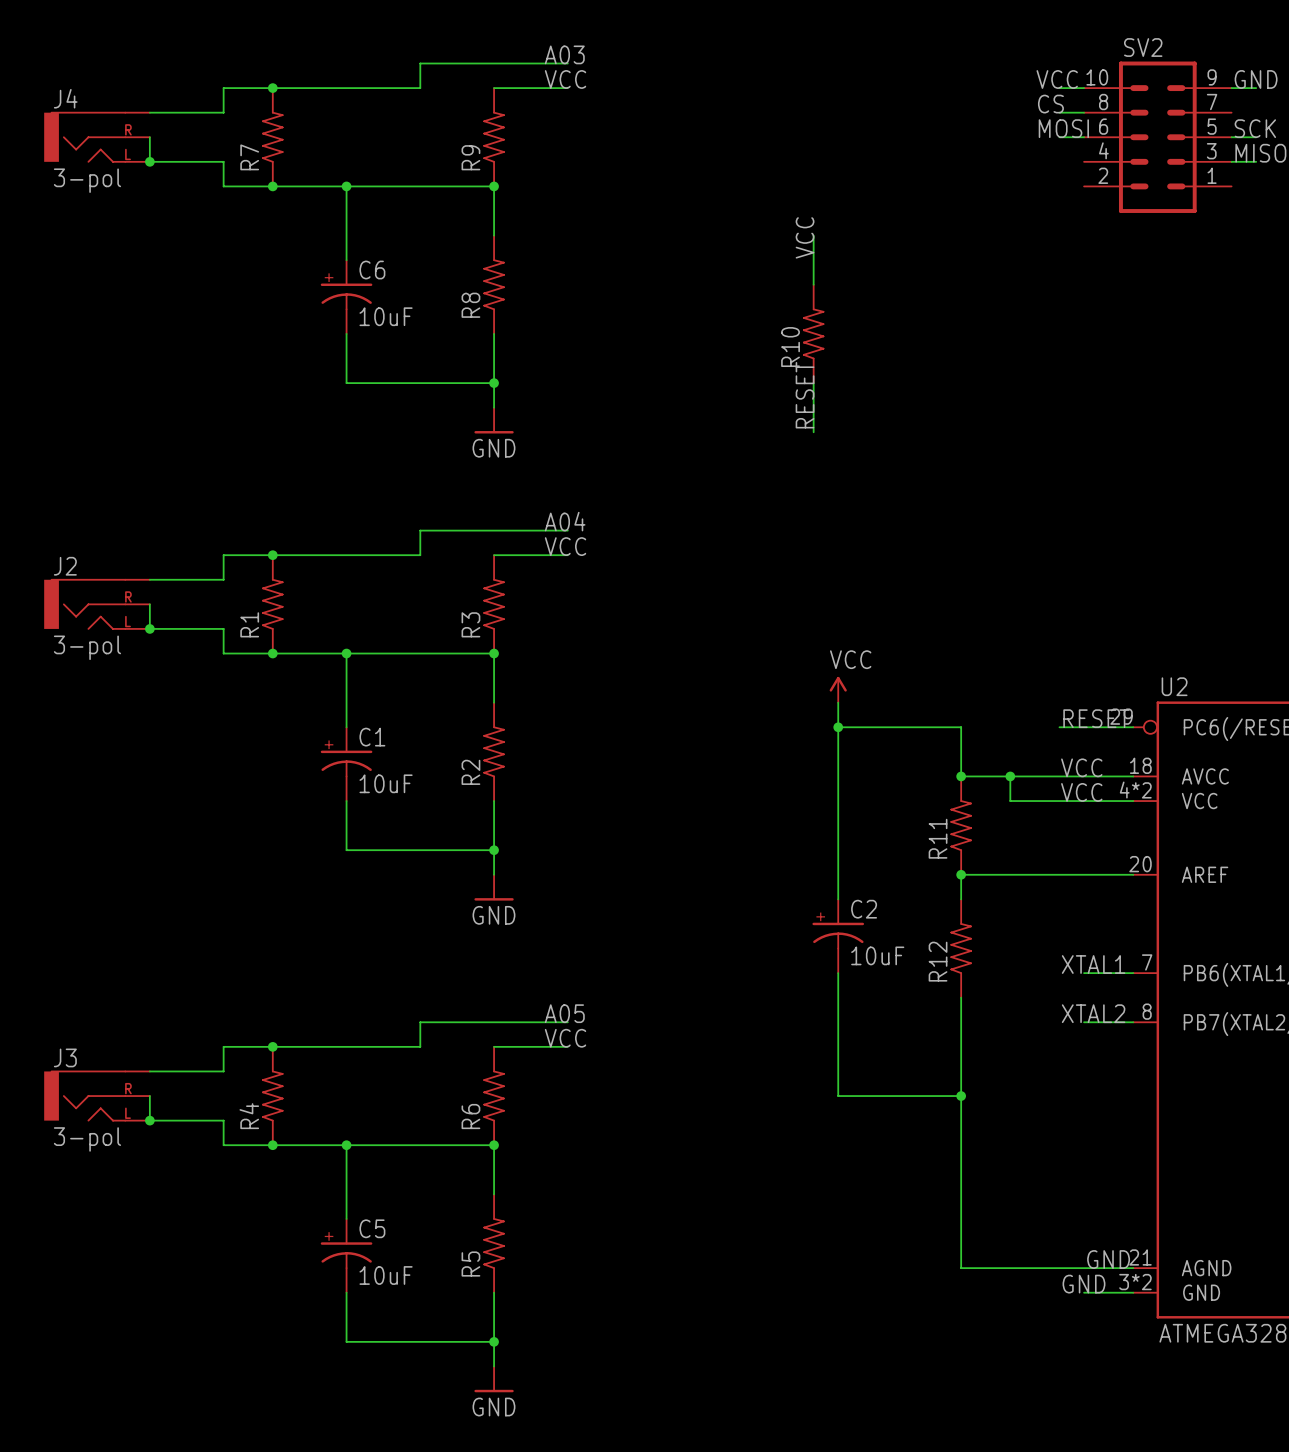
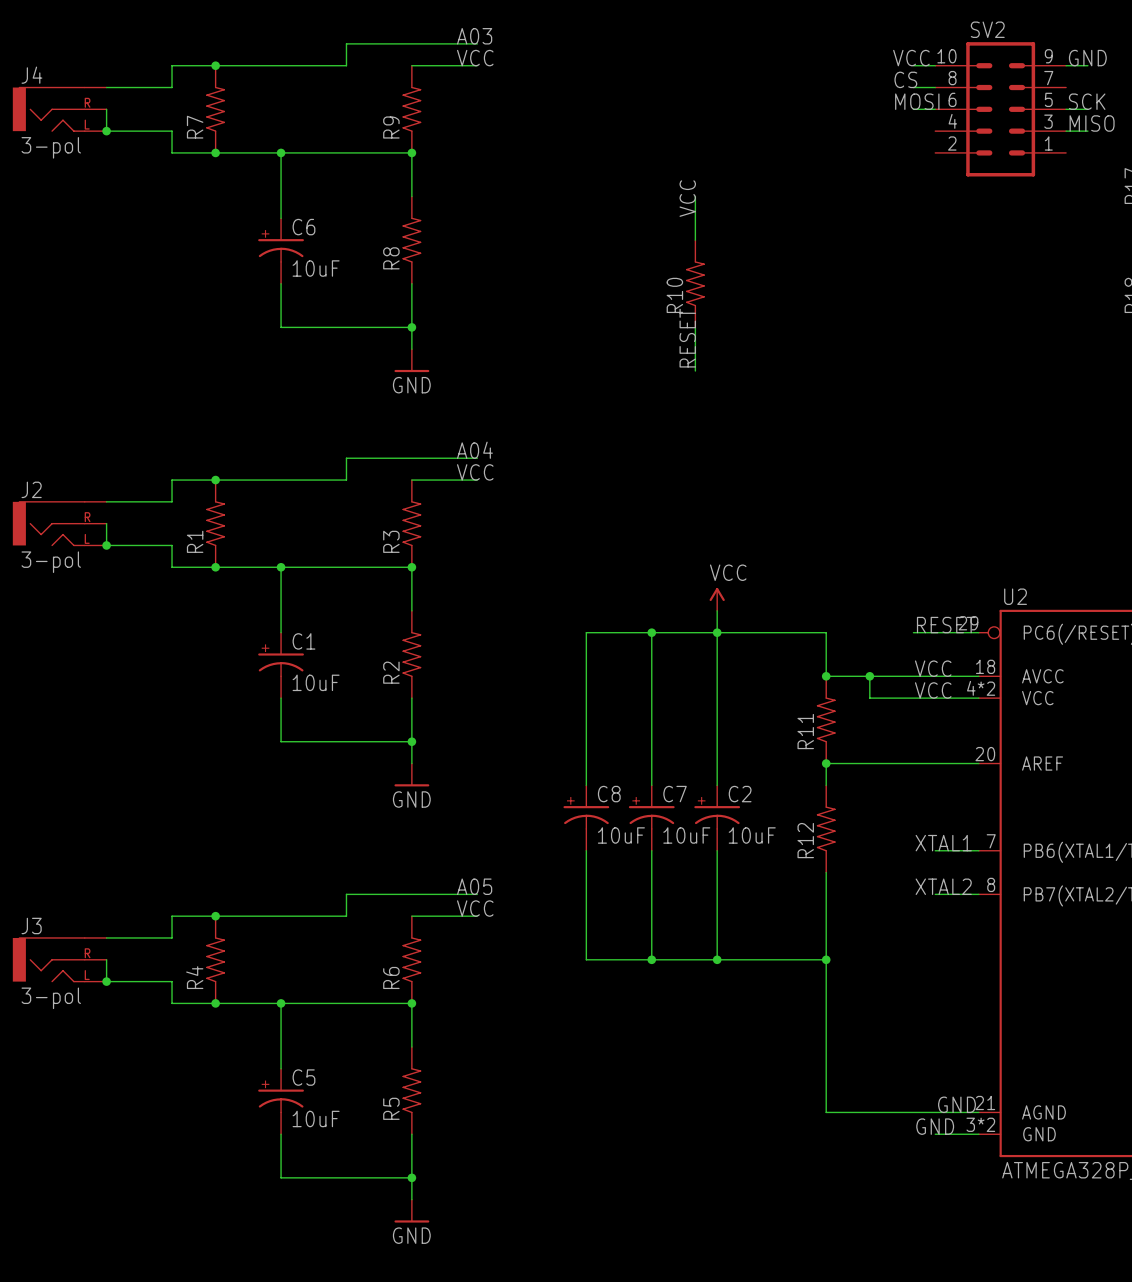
wire: none -> (651, 632) (651, 785)
junction: none -> (651, 632)
wire: none -> (717, 632) (586, 632) (586, 785)
C8: none -> 10uF (586, 818)
C7: none -> 10uF (651, 818)
wire: none -> (586, 850) (586, 959) (717, 959)
wire: none -> (651, 850) (651, 959)
junction: none -> (651, 959)
junction: none -> (717, 959)

